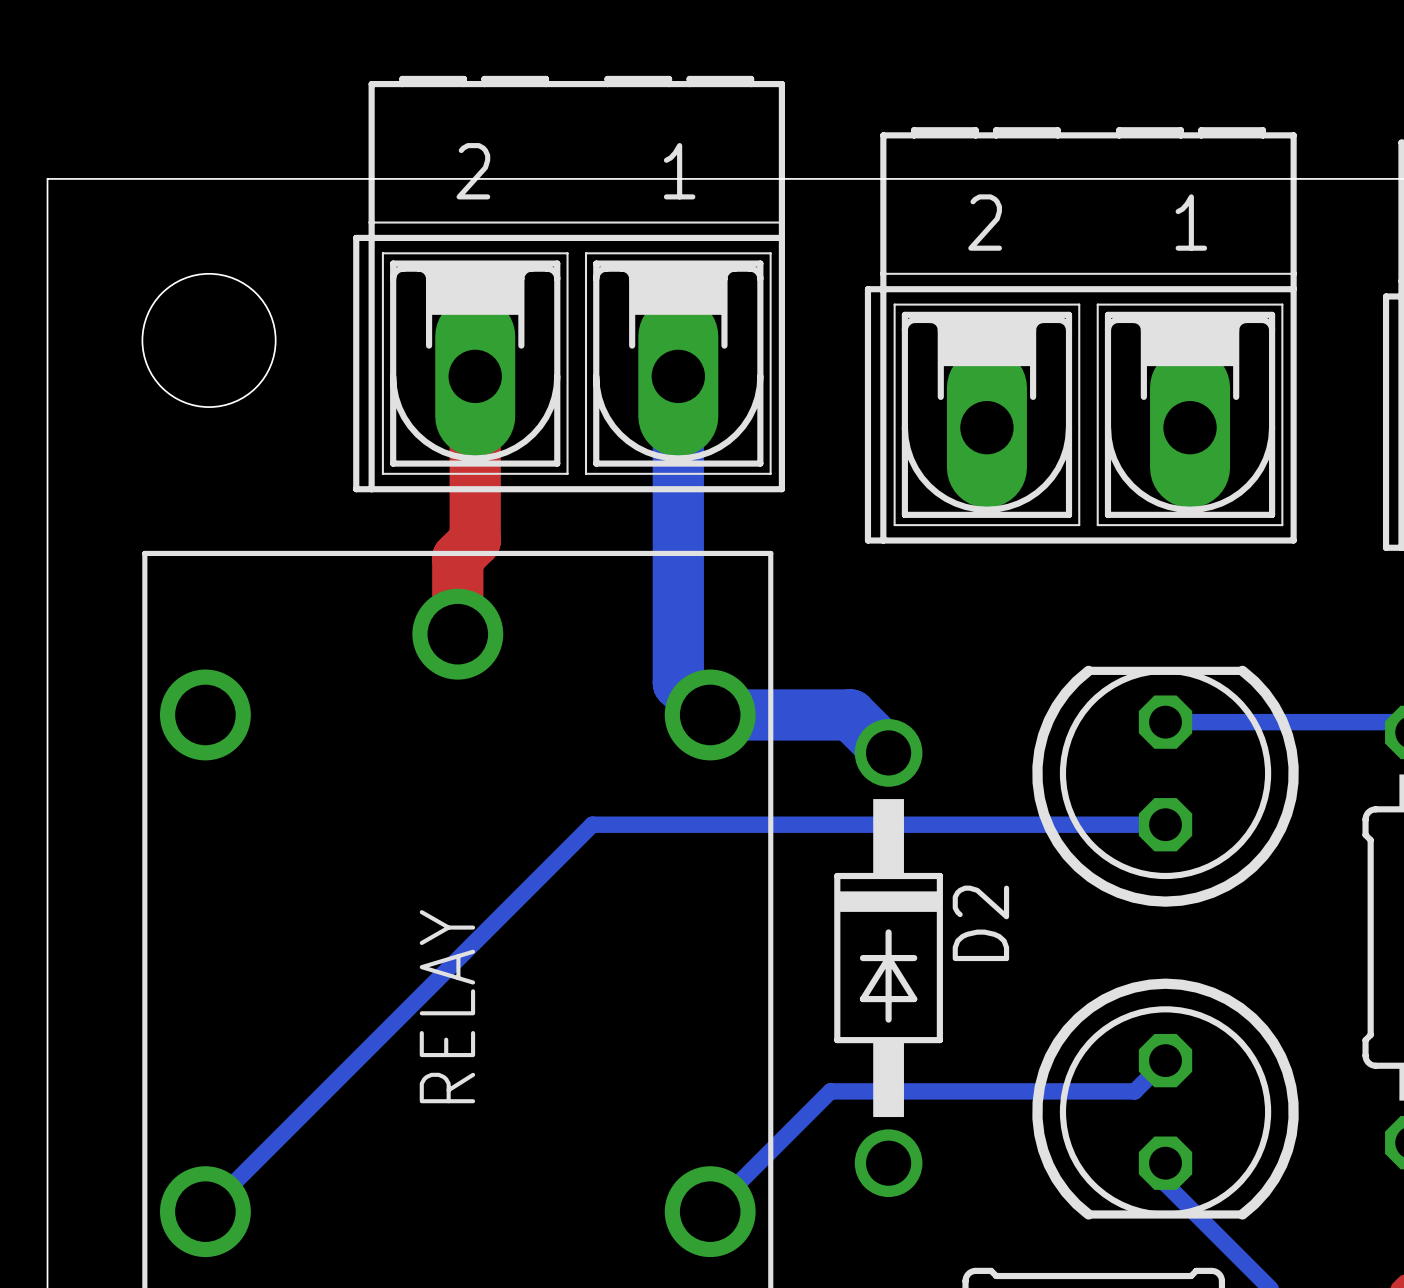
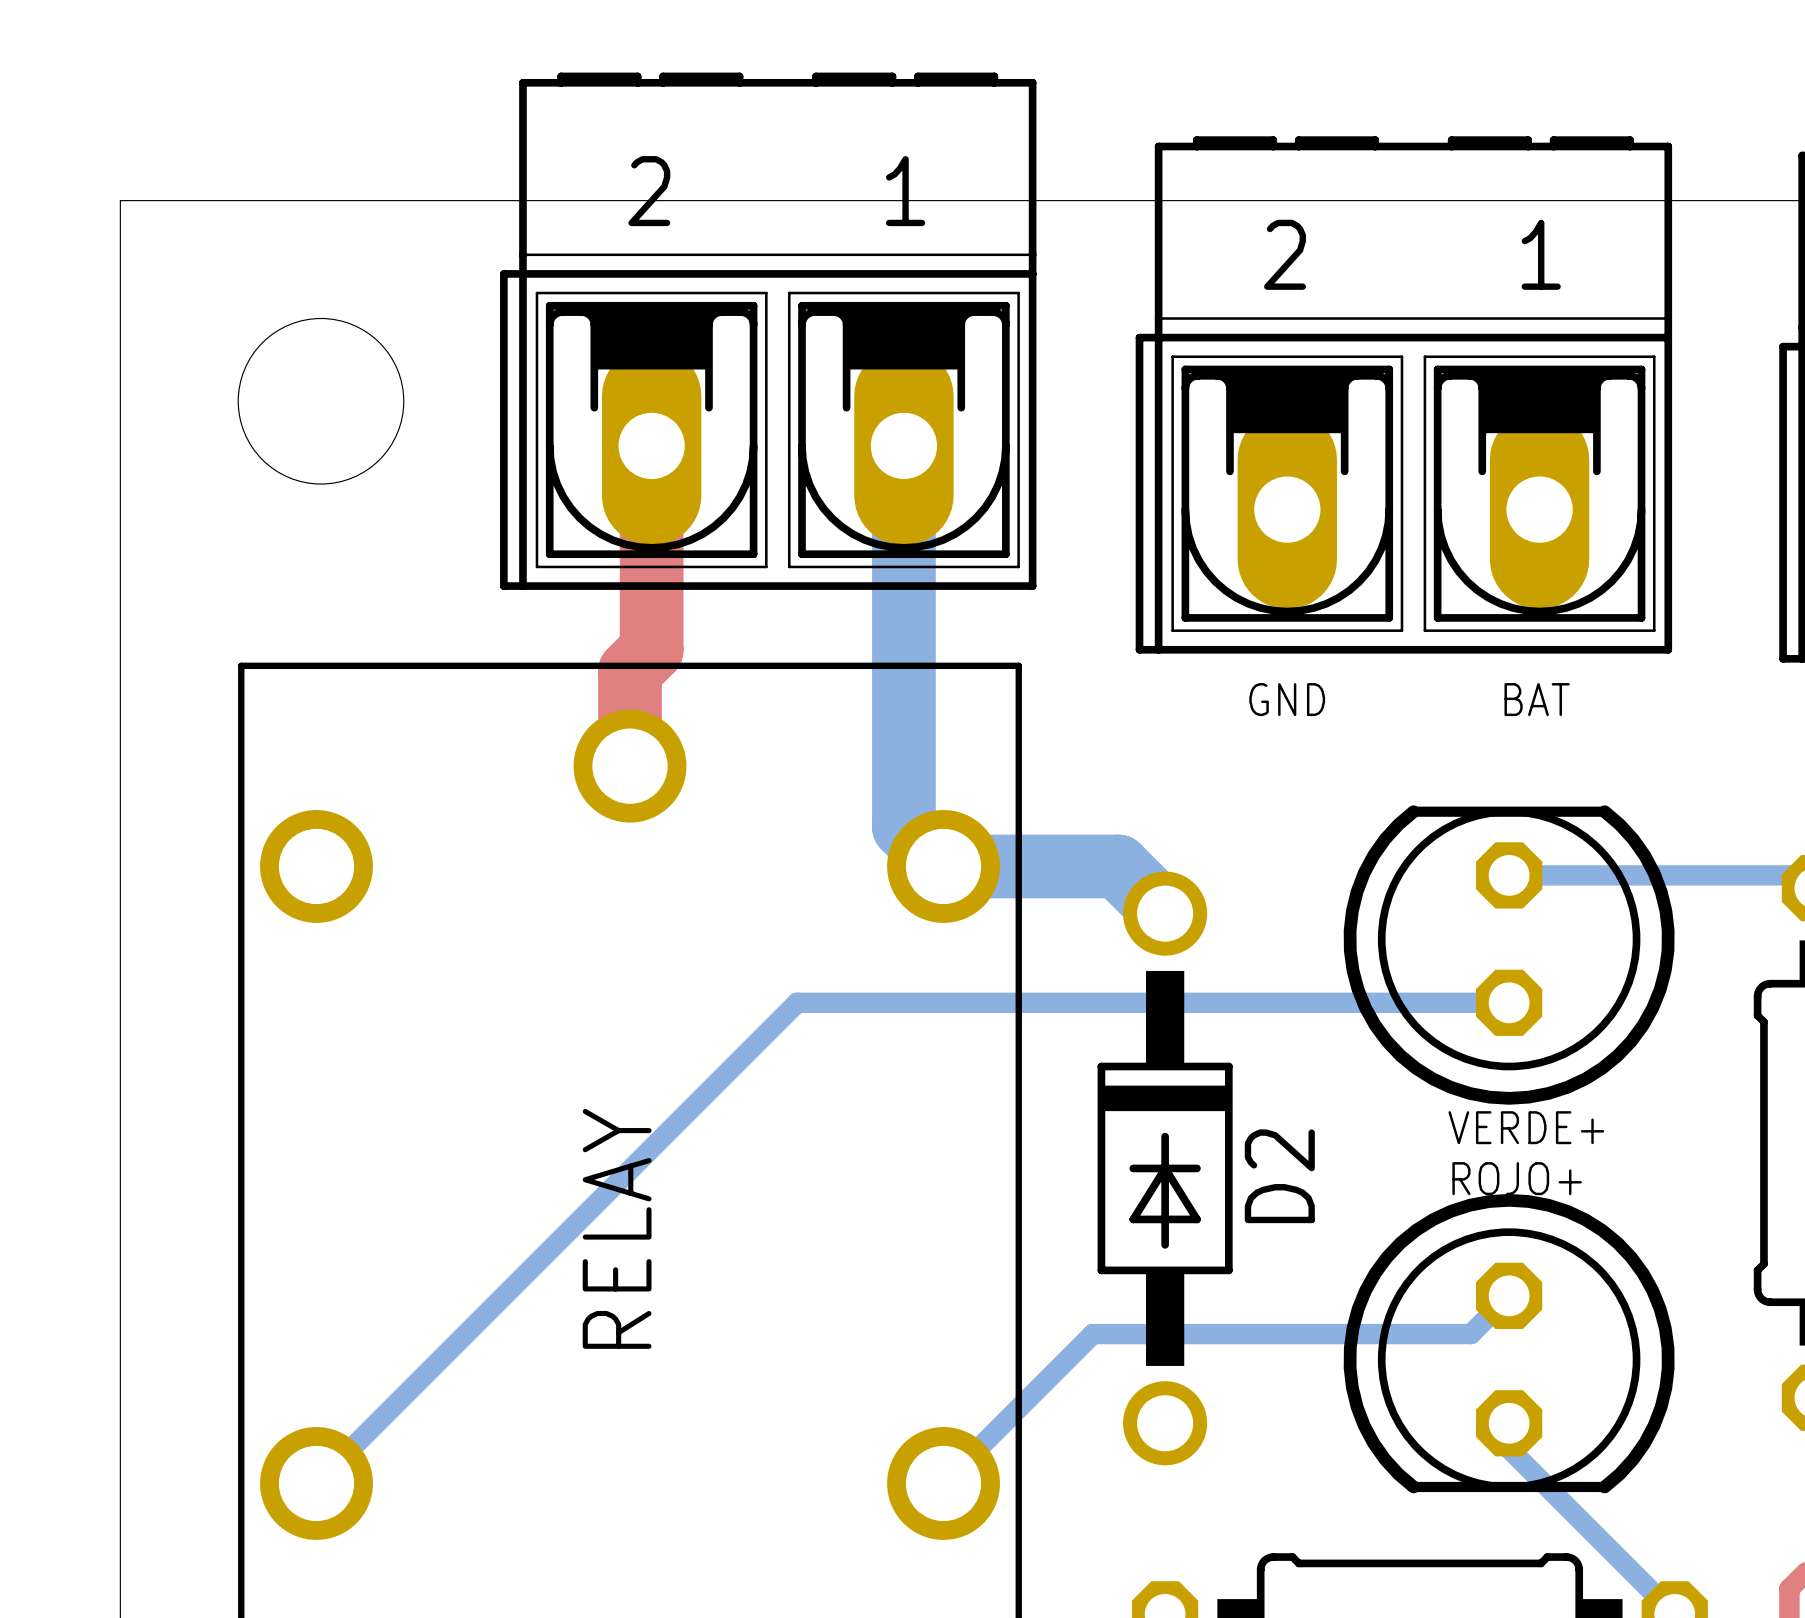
text: none -> GND (1287, 699)
text: none -> BAT (1537, 699)
D2 name position: D2 (980, 923) -> D2 (1279, 1176)
text: none -> VERDE+ (1526, 1127)
text: none -> ROJO+ (1517, 1178)

